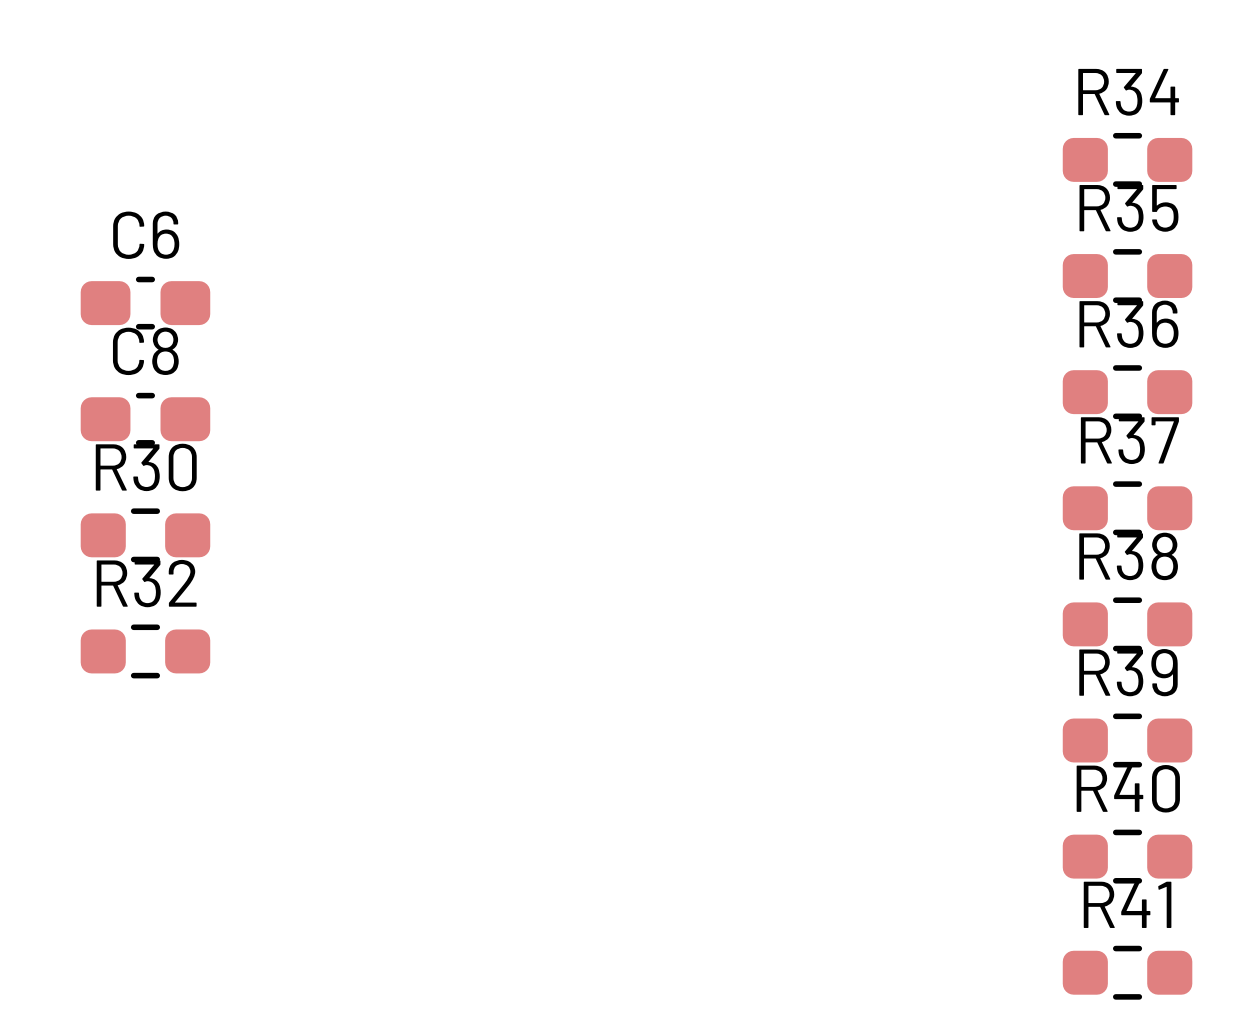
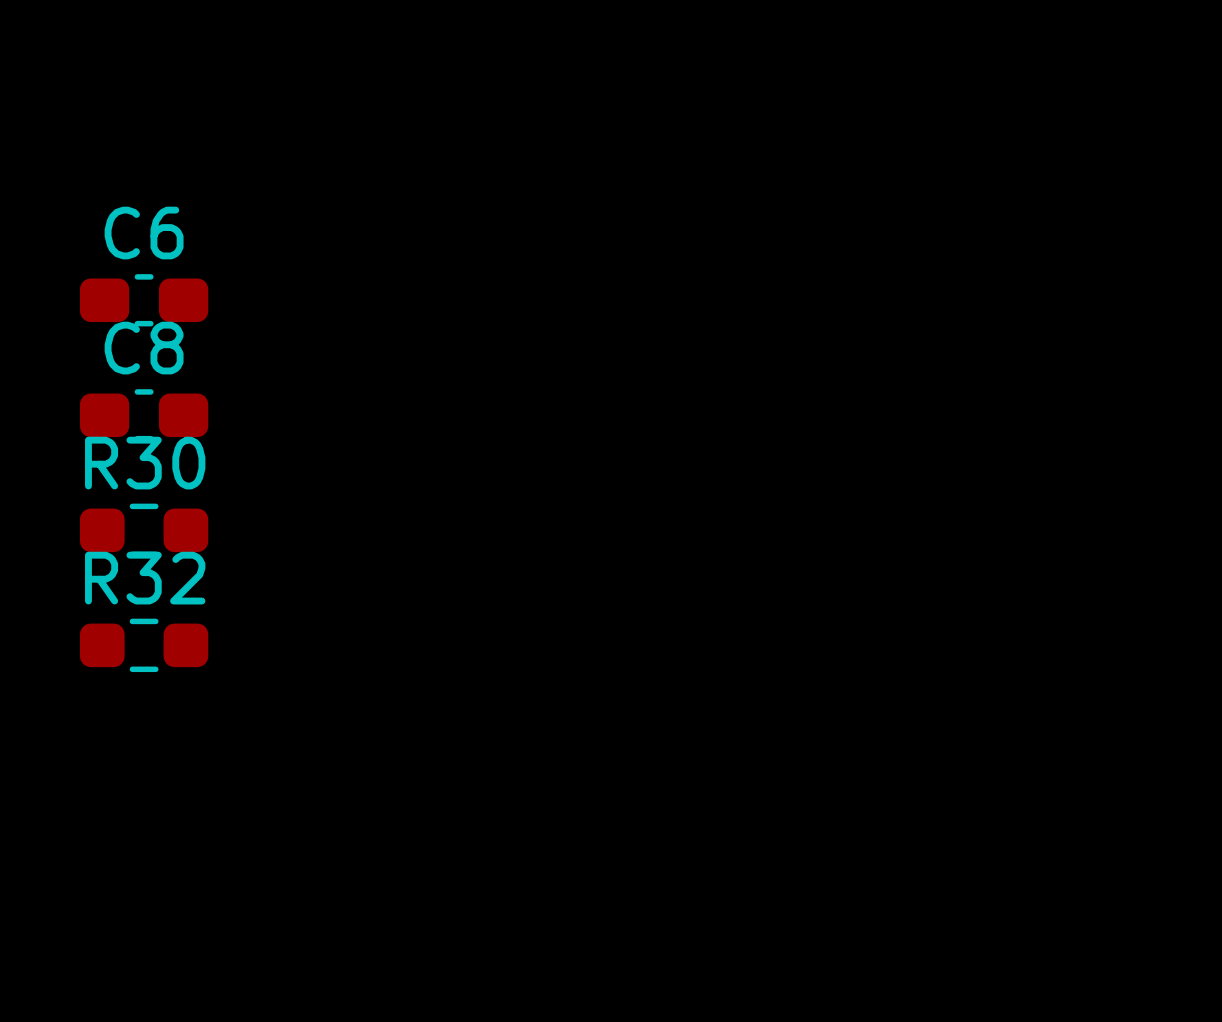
R34: (1127, 159) -> none
R35: (1127, 276) -> none
R36: (1127, 392) -> none
R37: (1127, 508) -> none
R38: (1127, 624) -> none
R39: (1127, 740) -> none
R40: (1127, 856) -> none
R41: (1127, 972) -> none

